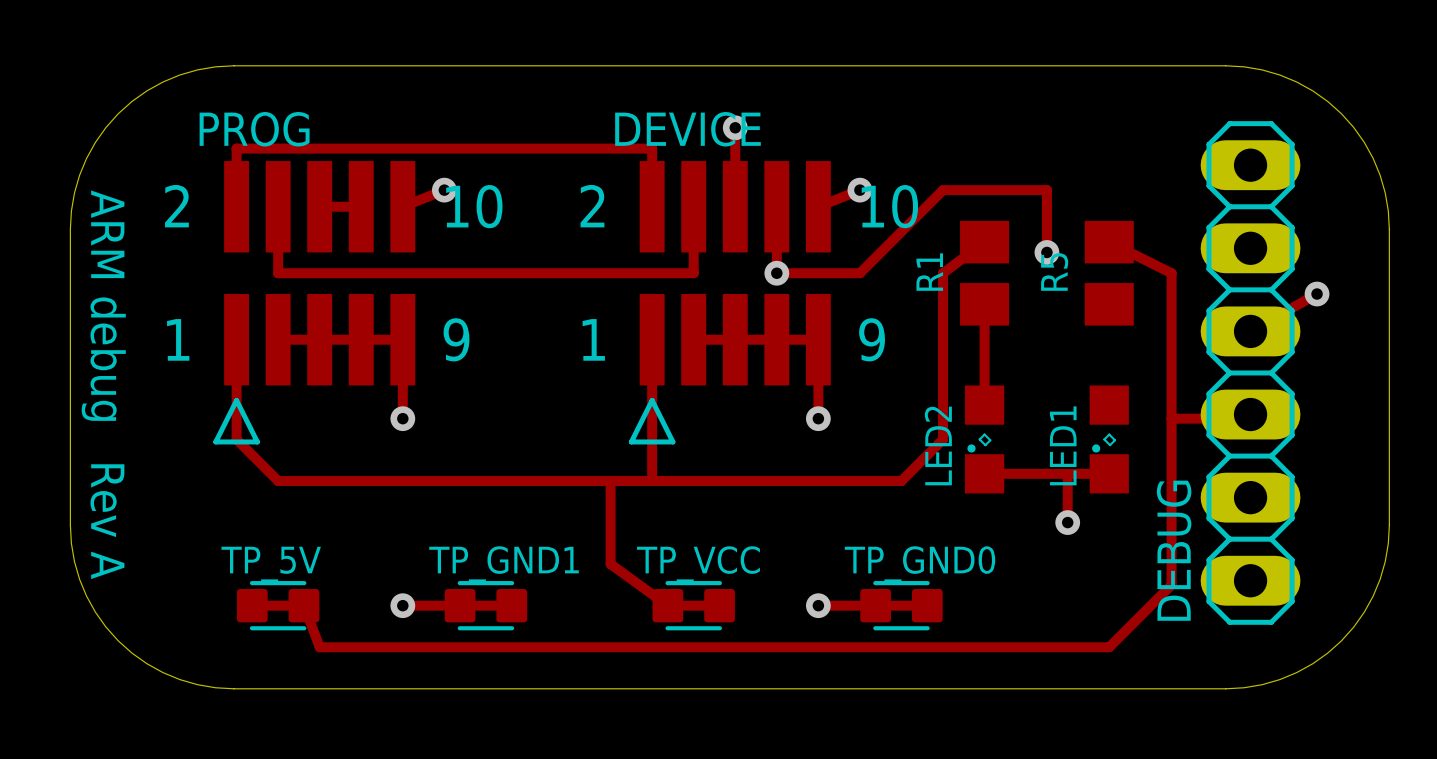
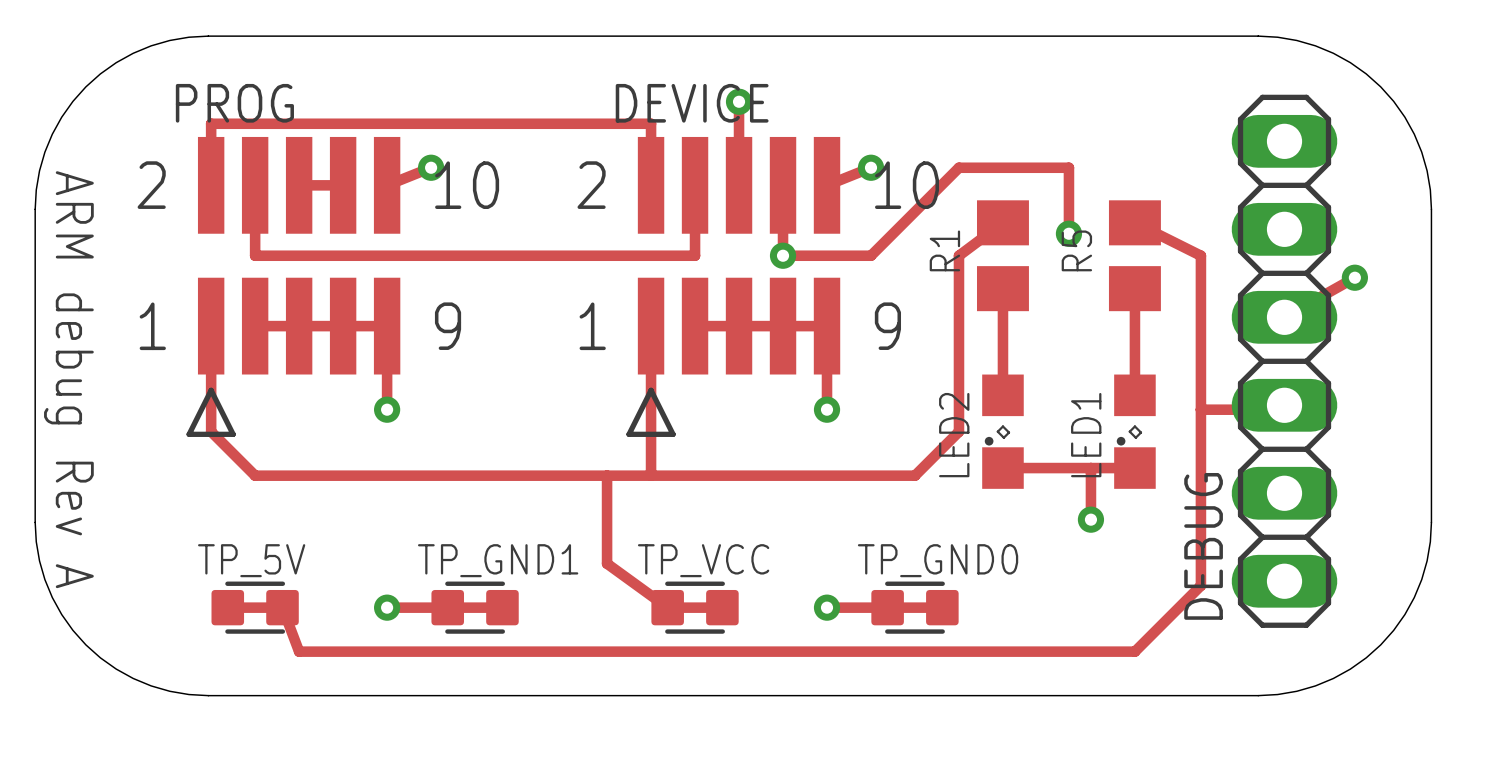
track: none -> (1134, 288) (1134, 395)

